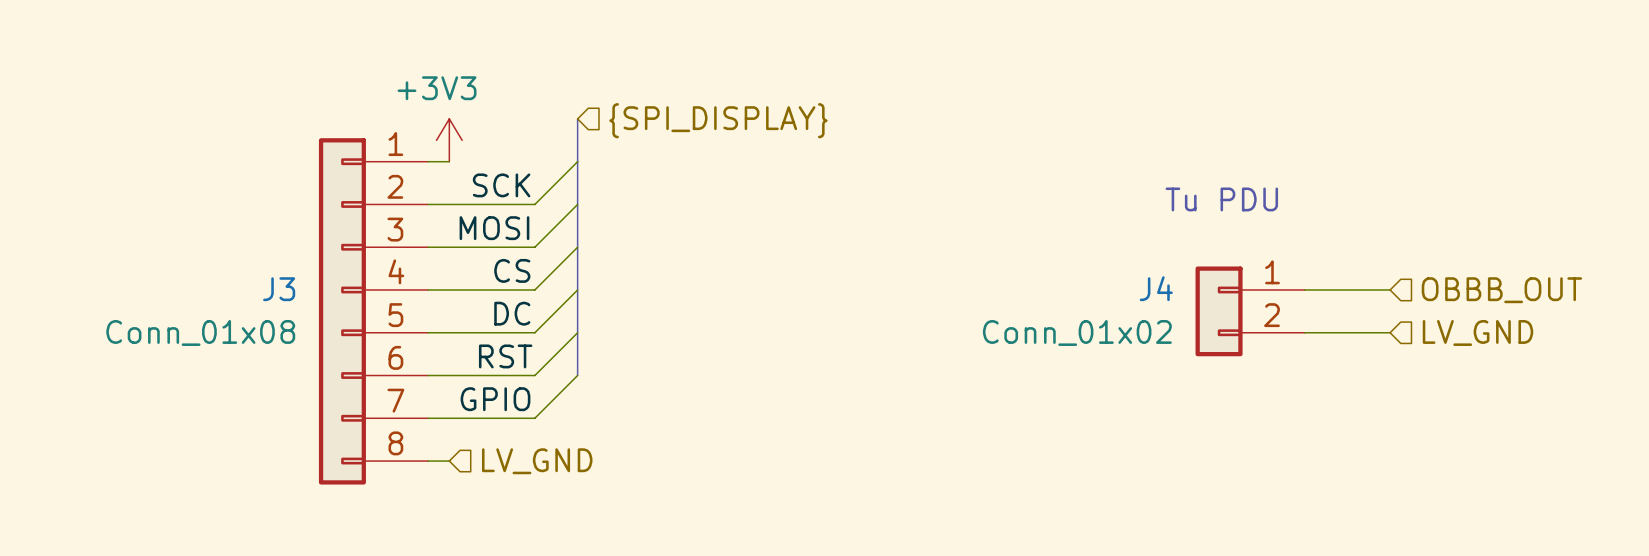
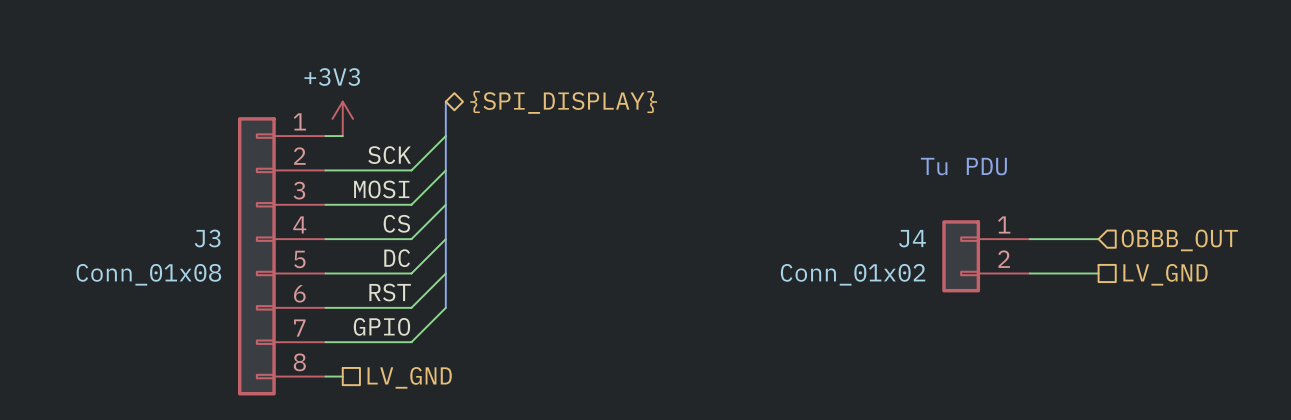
hierarchical label shape: input (718, 120) -> bidirectional (563, 102)
hierarchical label shape: input (1477, 332) -> passive (1165, 274)
hierarchical label shape: input (537, 461) -> passive (409, 377)

